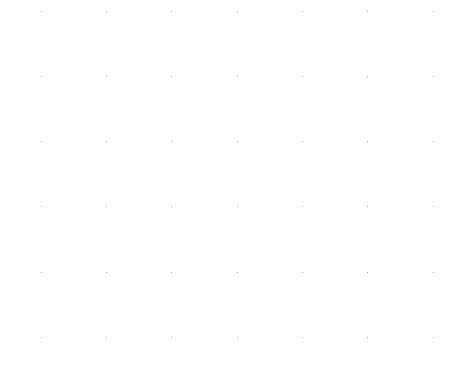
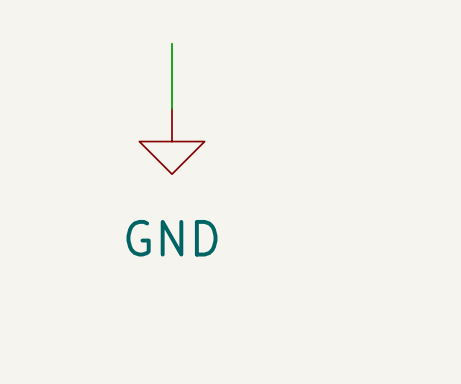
wire: none -> (171, 43) (171, 108)
power symbol: none -> GND (171, 141)

